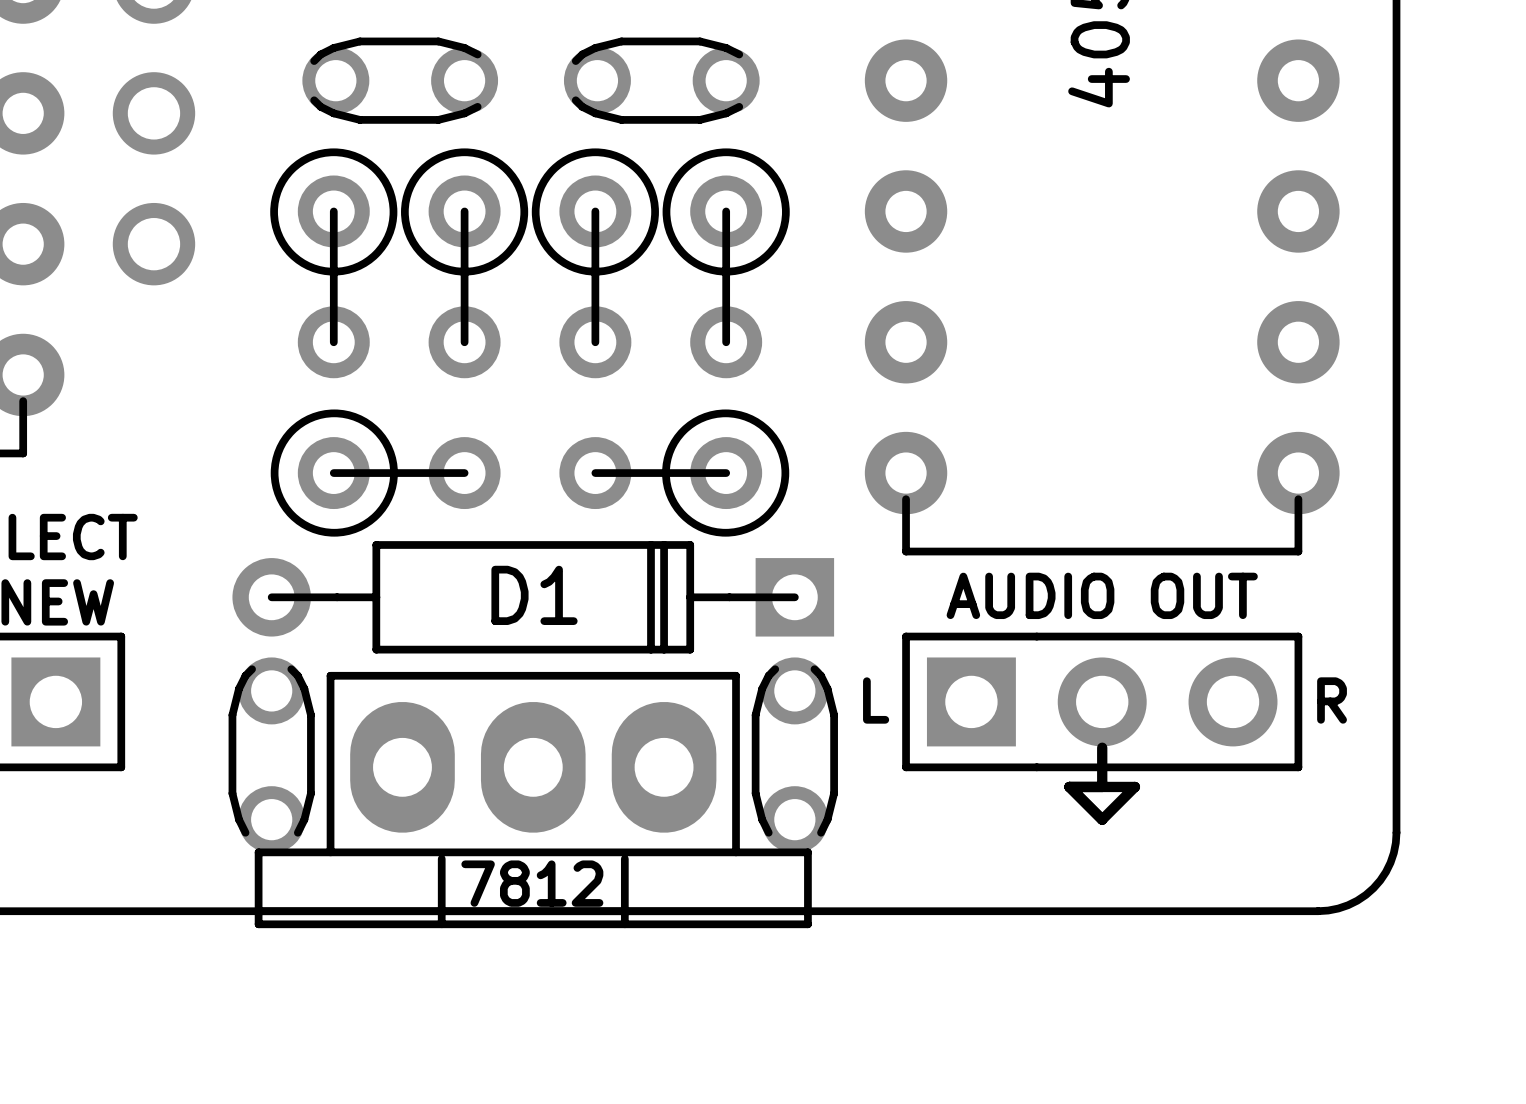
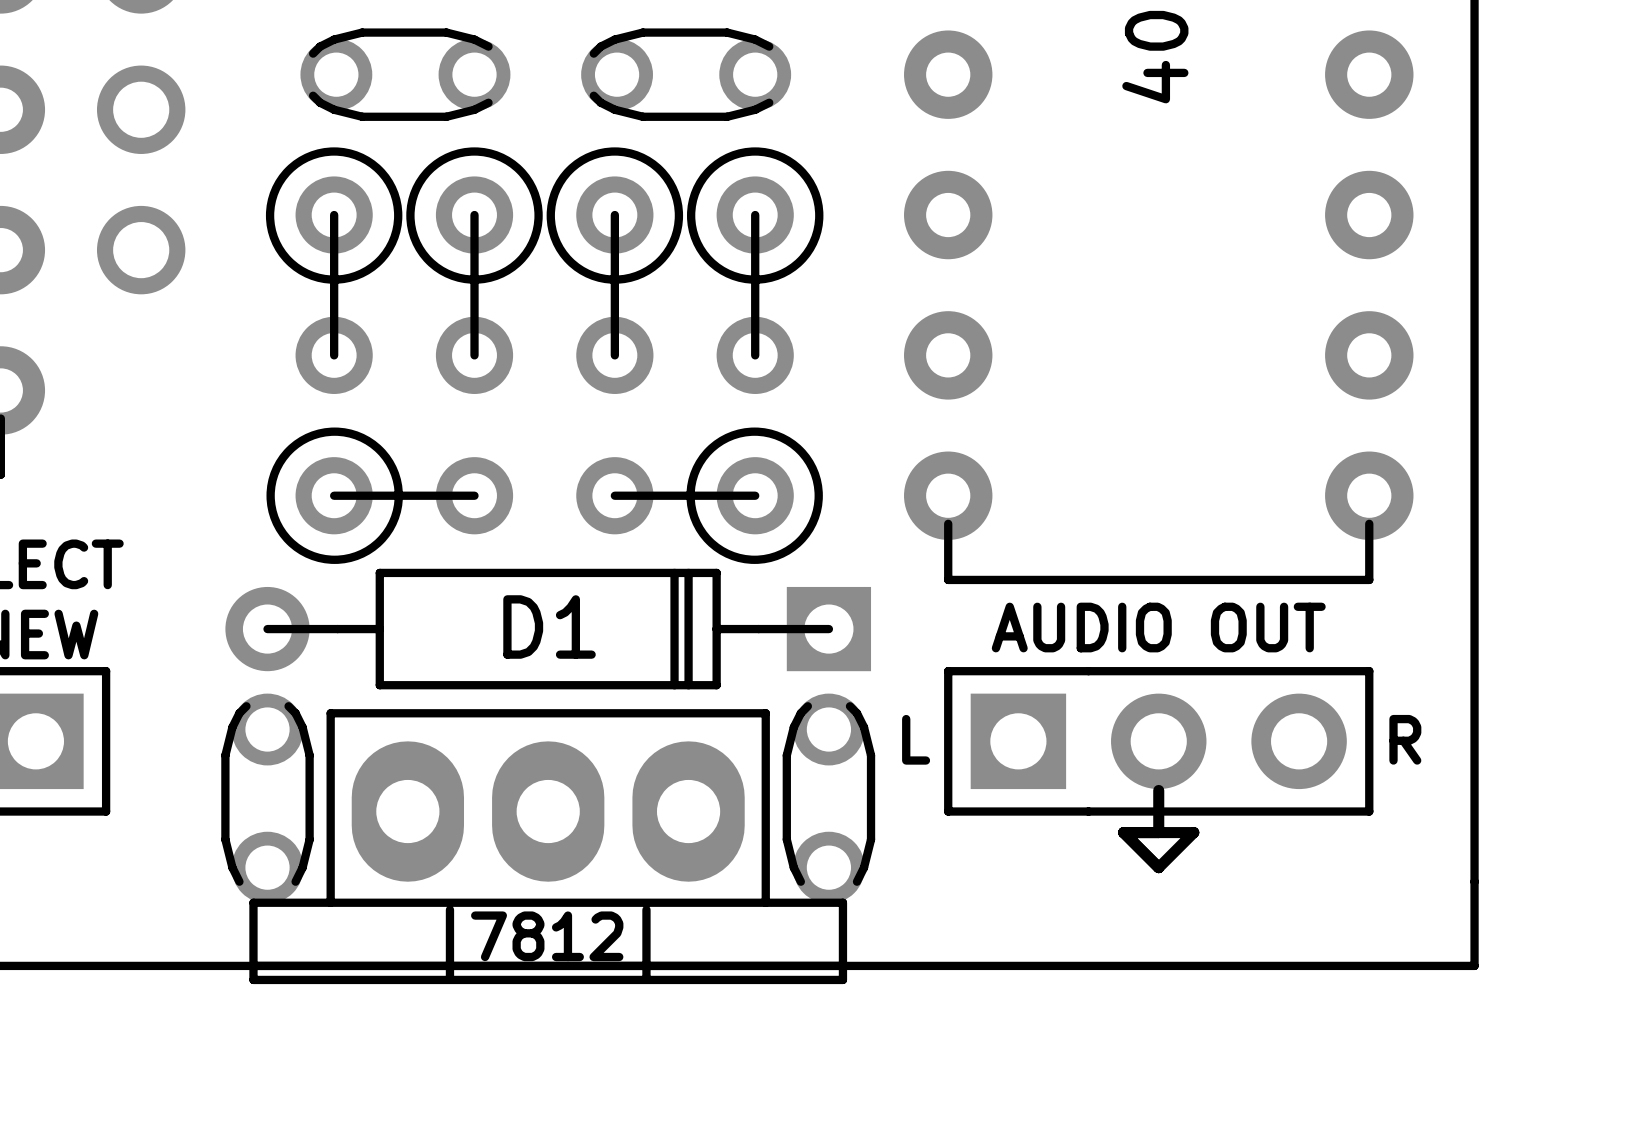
board edge: (1396, 832) (1390, 862) (1373, 888) (1348, 905) (1318, 911) -> (1474, 881) (1474, 965) (1390, 965)

